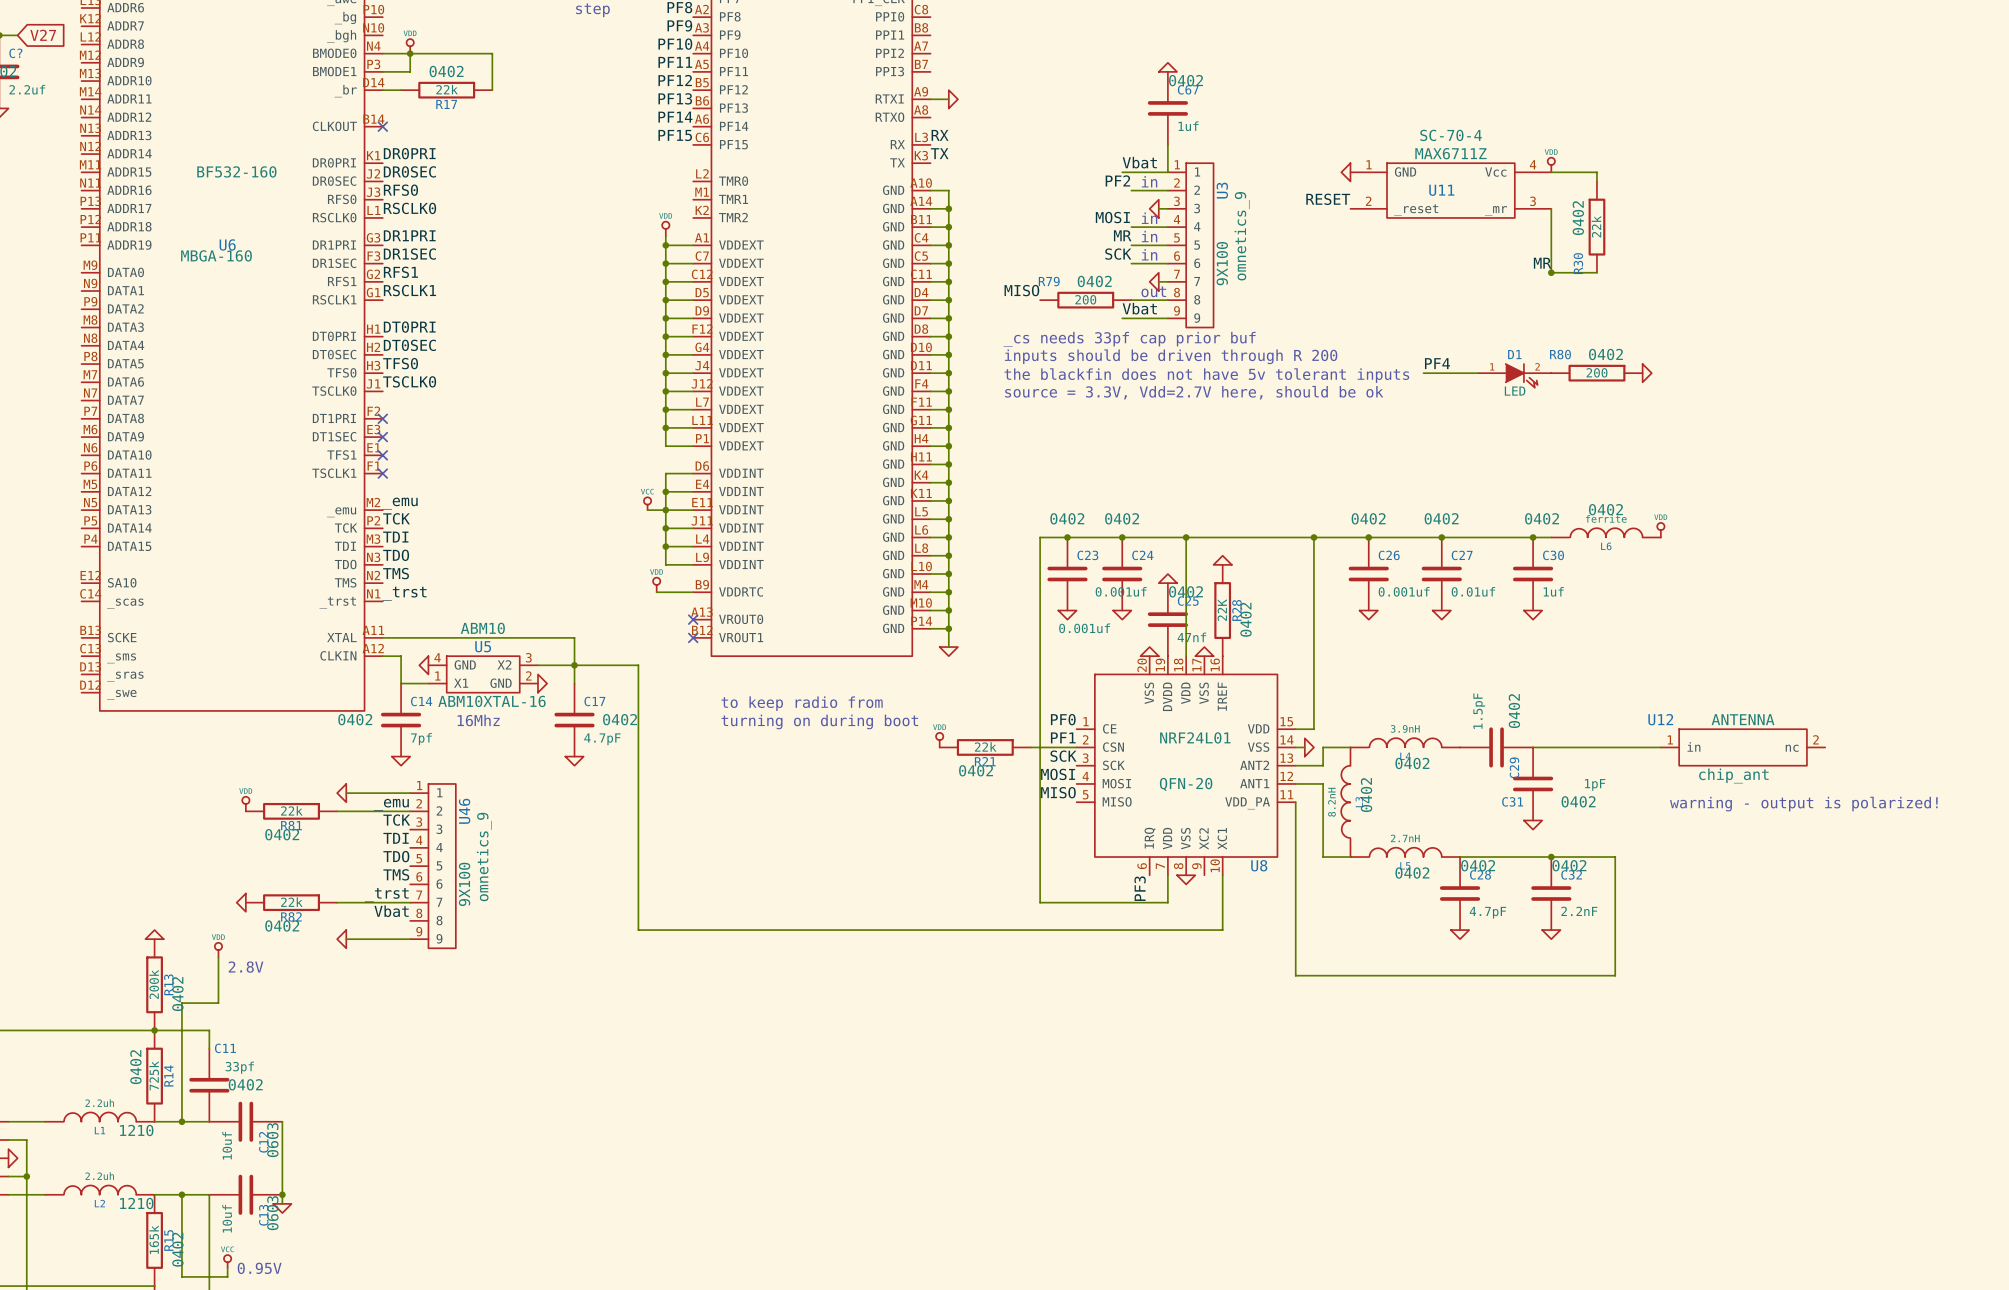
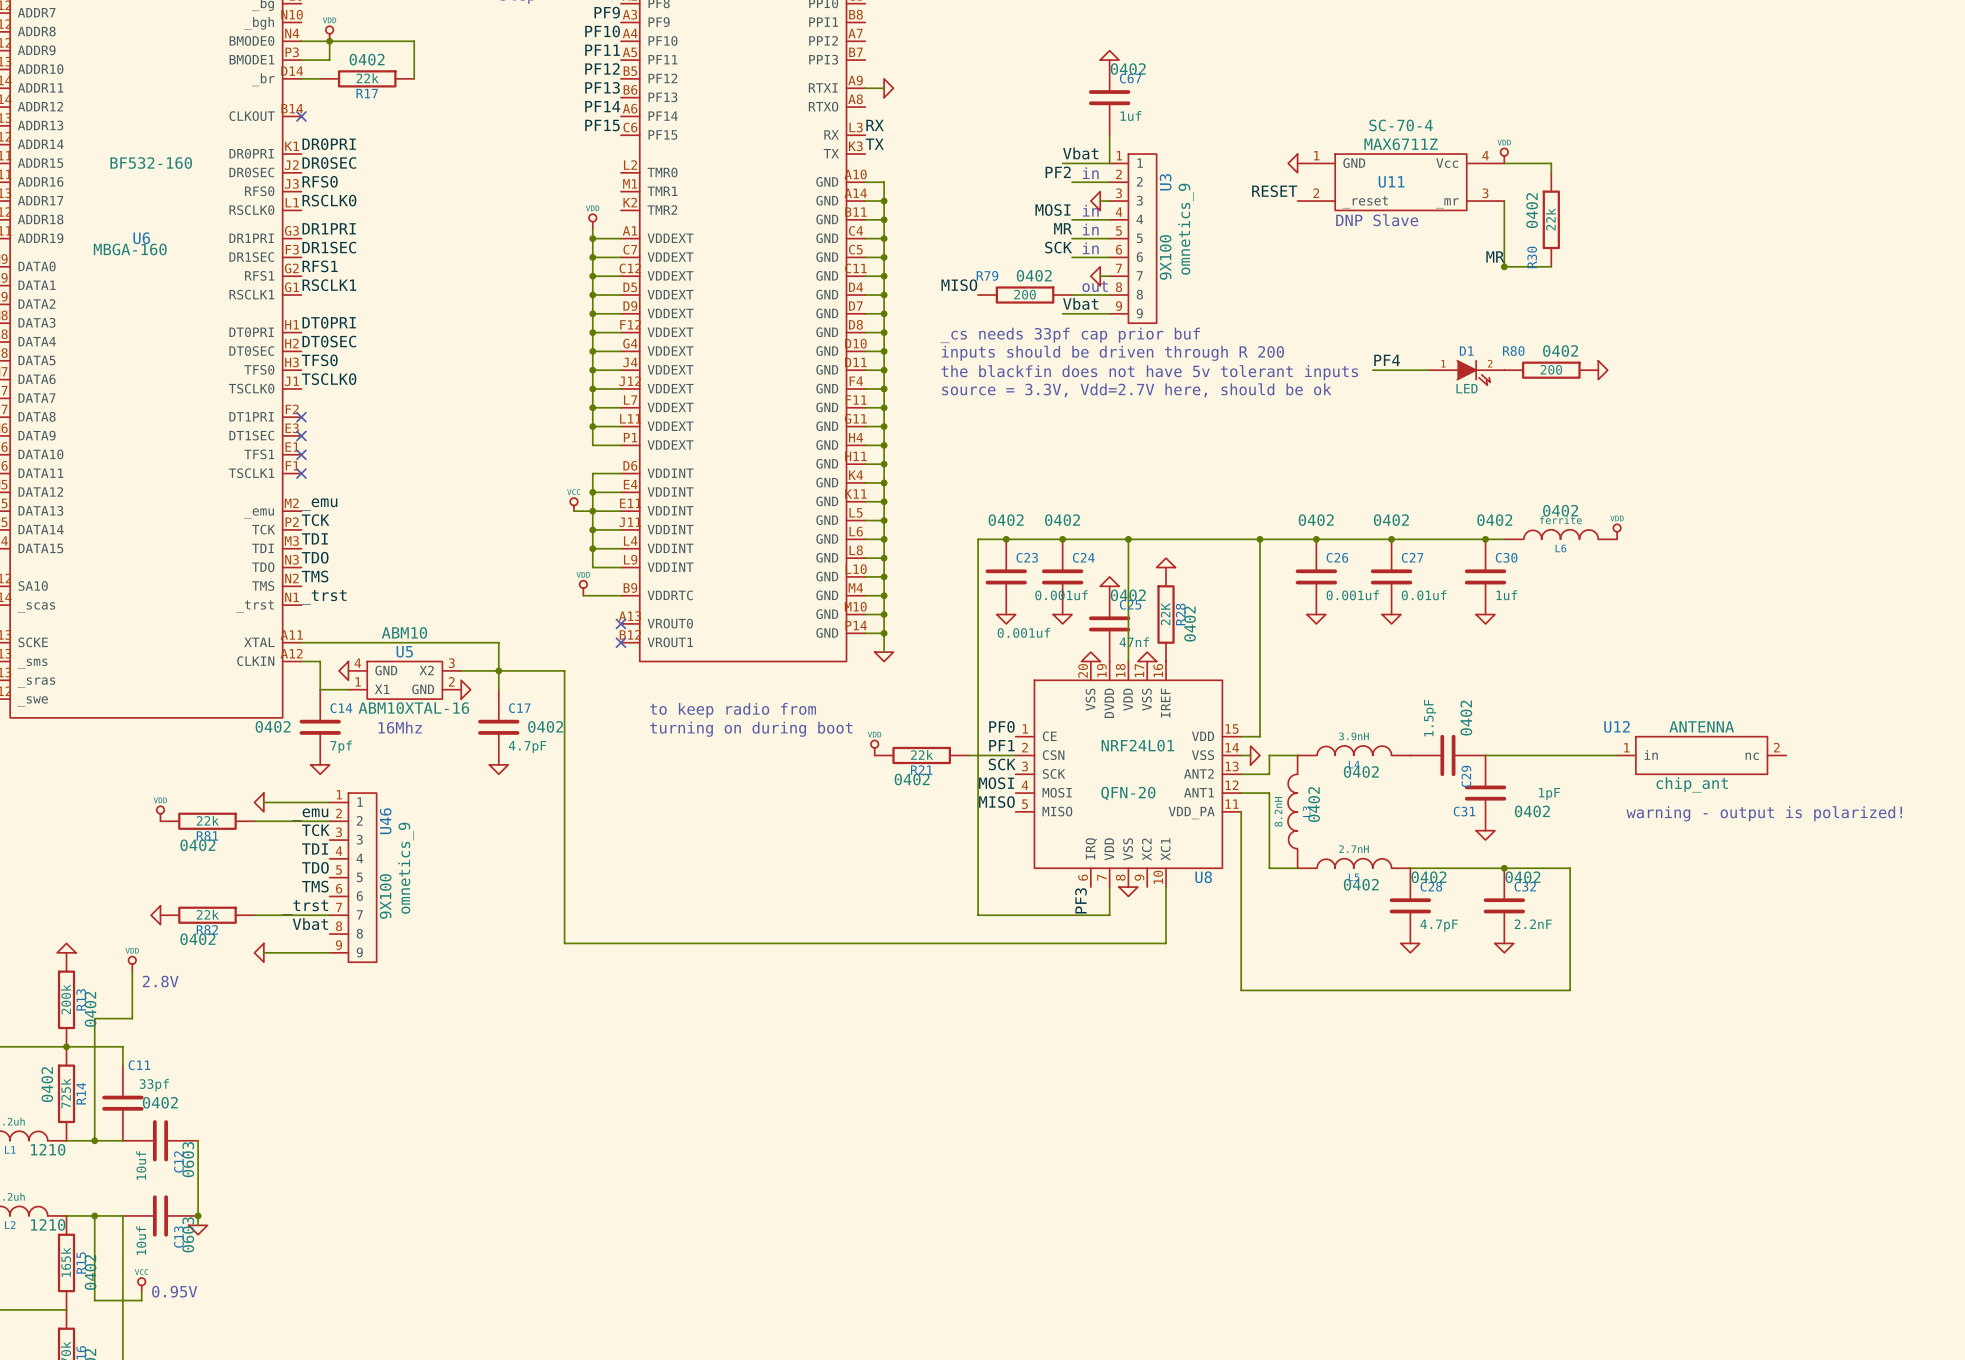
text: none -> DNP Slave (1377, 220)

